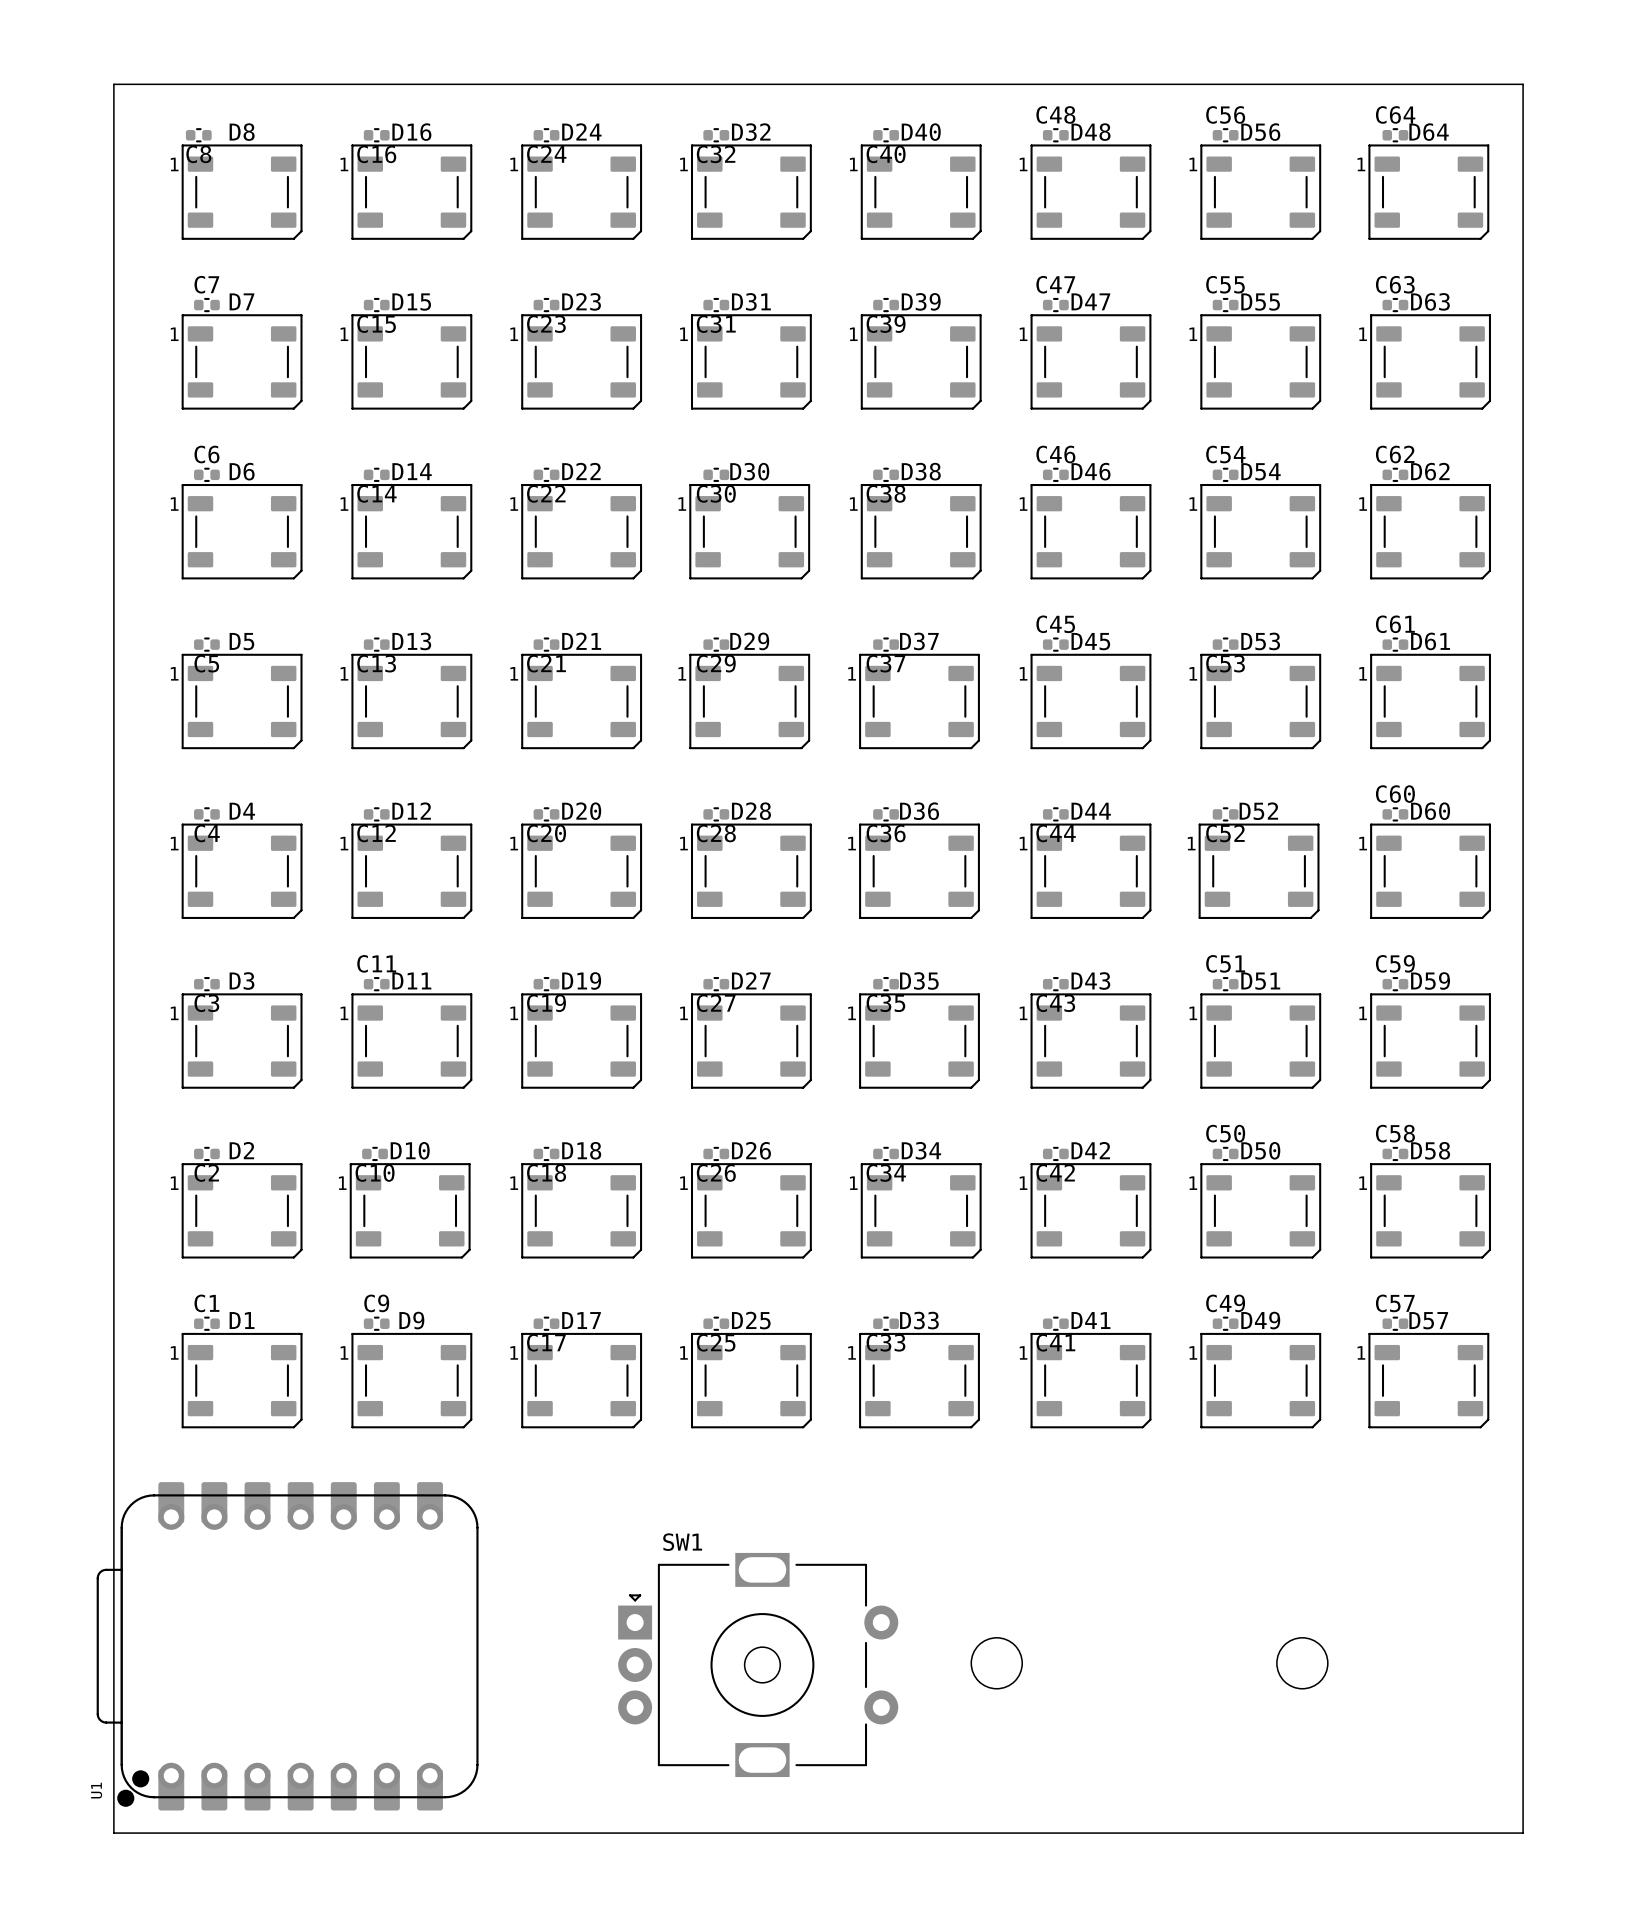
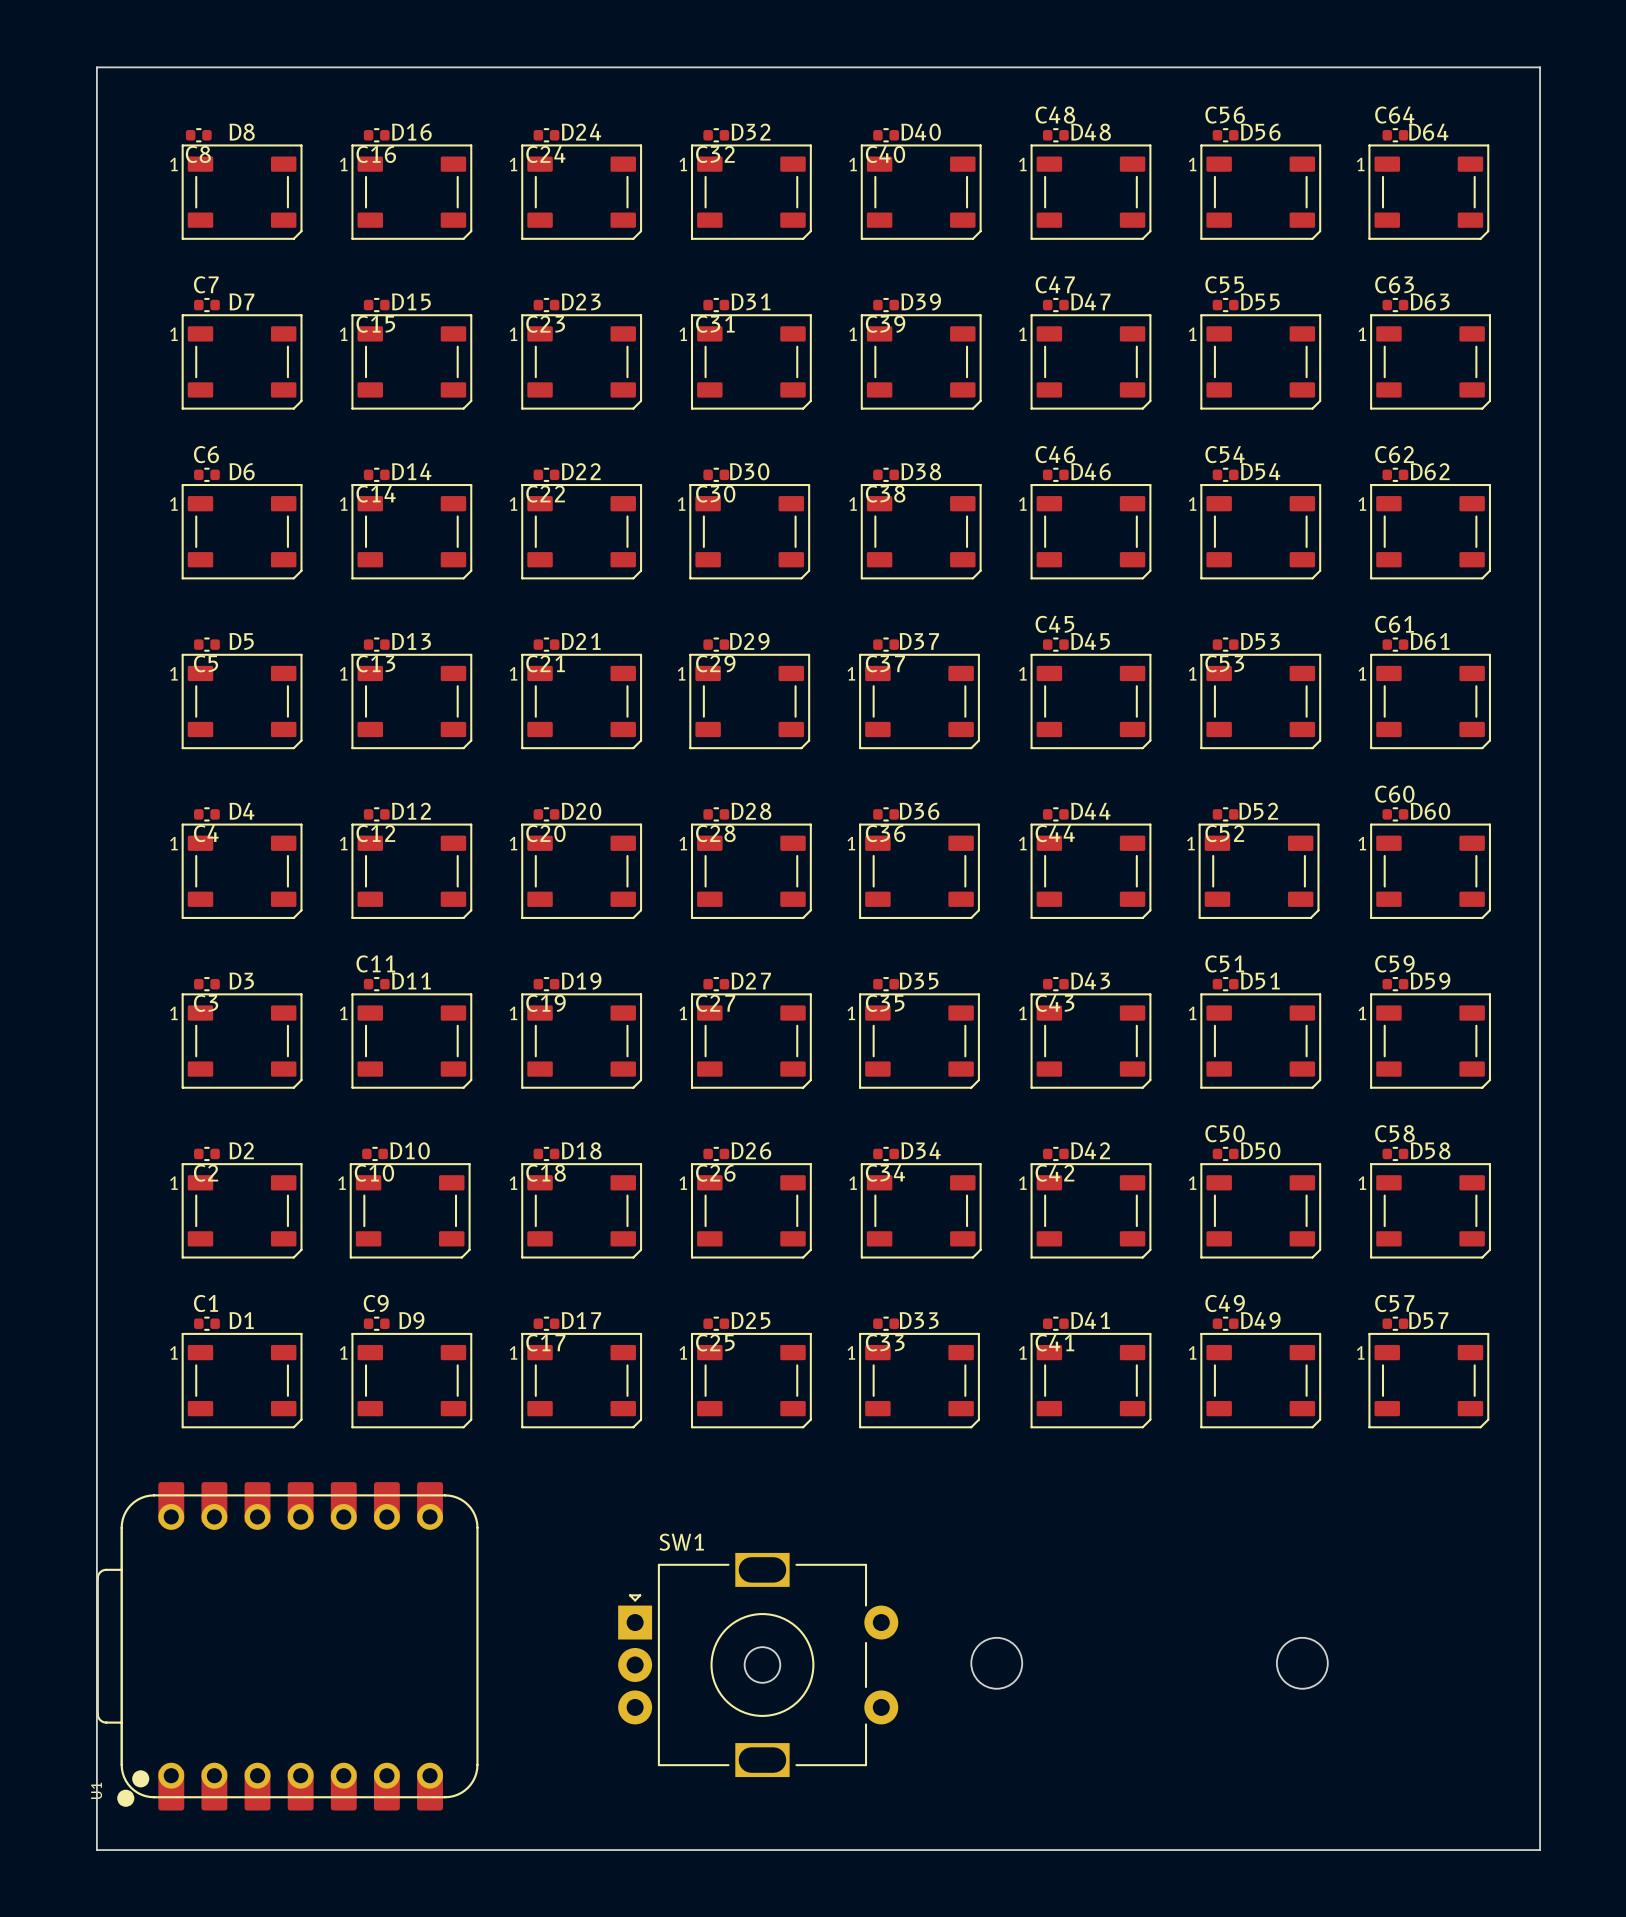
board edge: (113, 84) (1523, 84) (1523, 1833) (113, 1833) (113, 84) -> (96, 67) (96, 1850) (1540, 1850) (1540, 67) (96, 67)

